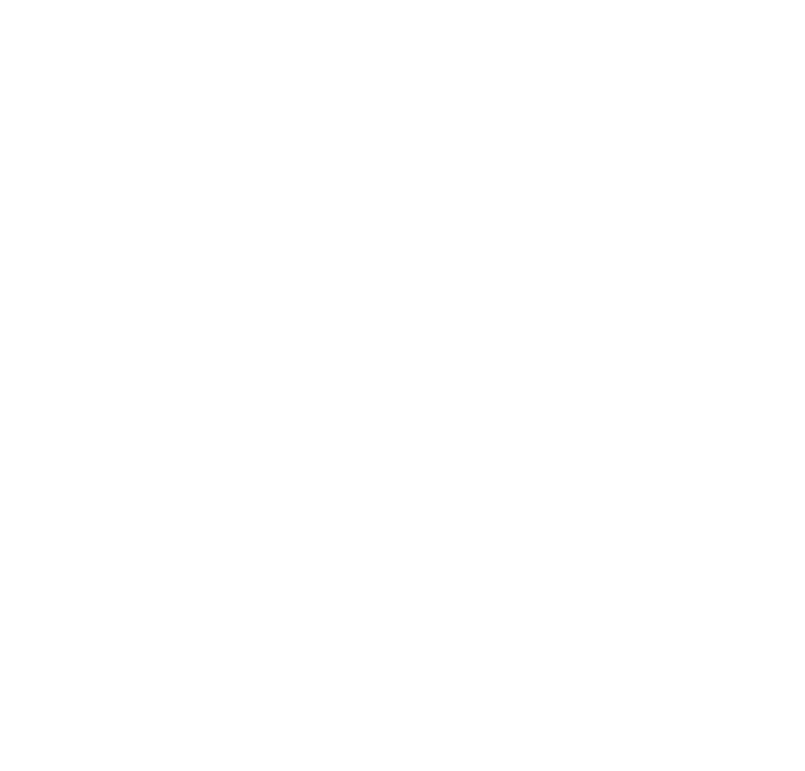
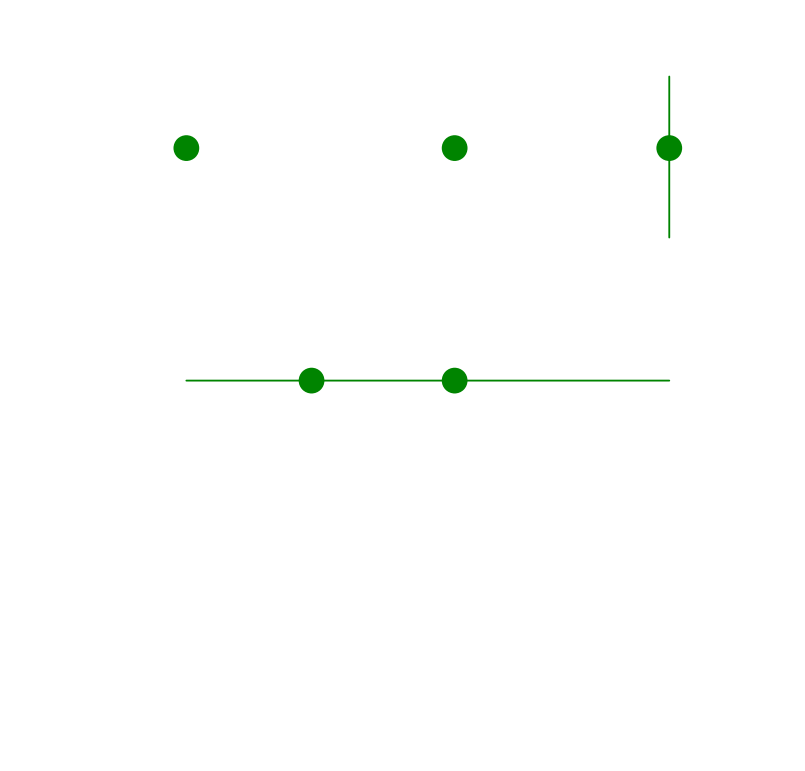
wire: none -> (669, 76) (669, 237)
junction: none -> (186, 148)
junction: none -> (454, 148)
junction: none -> (669, 148)
wire: none -> (186, 380) (669, 380)
junction: none -> (311, 380)
junction: none -> (454, 380)

